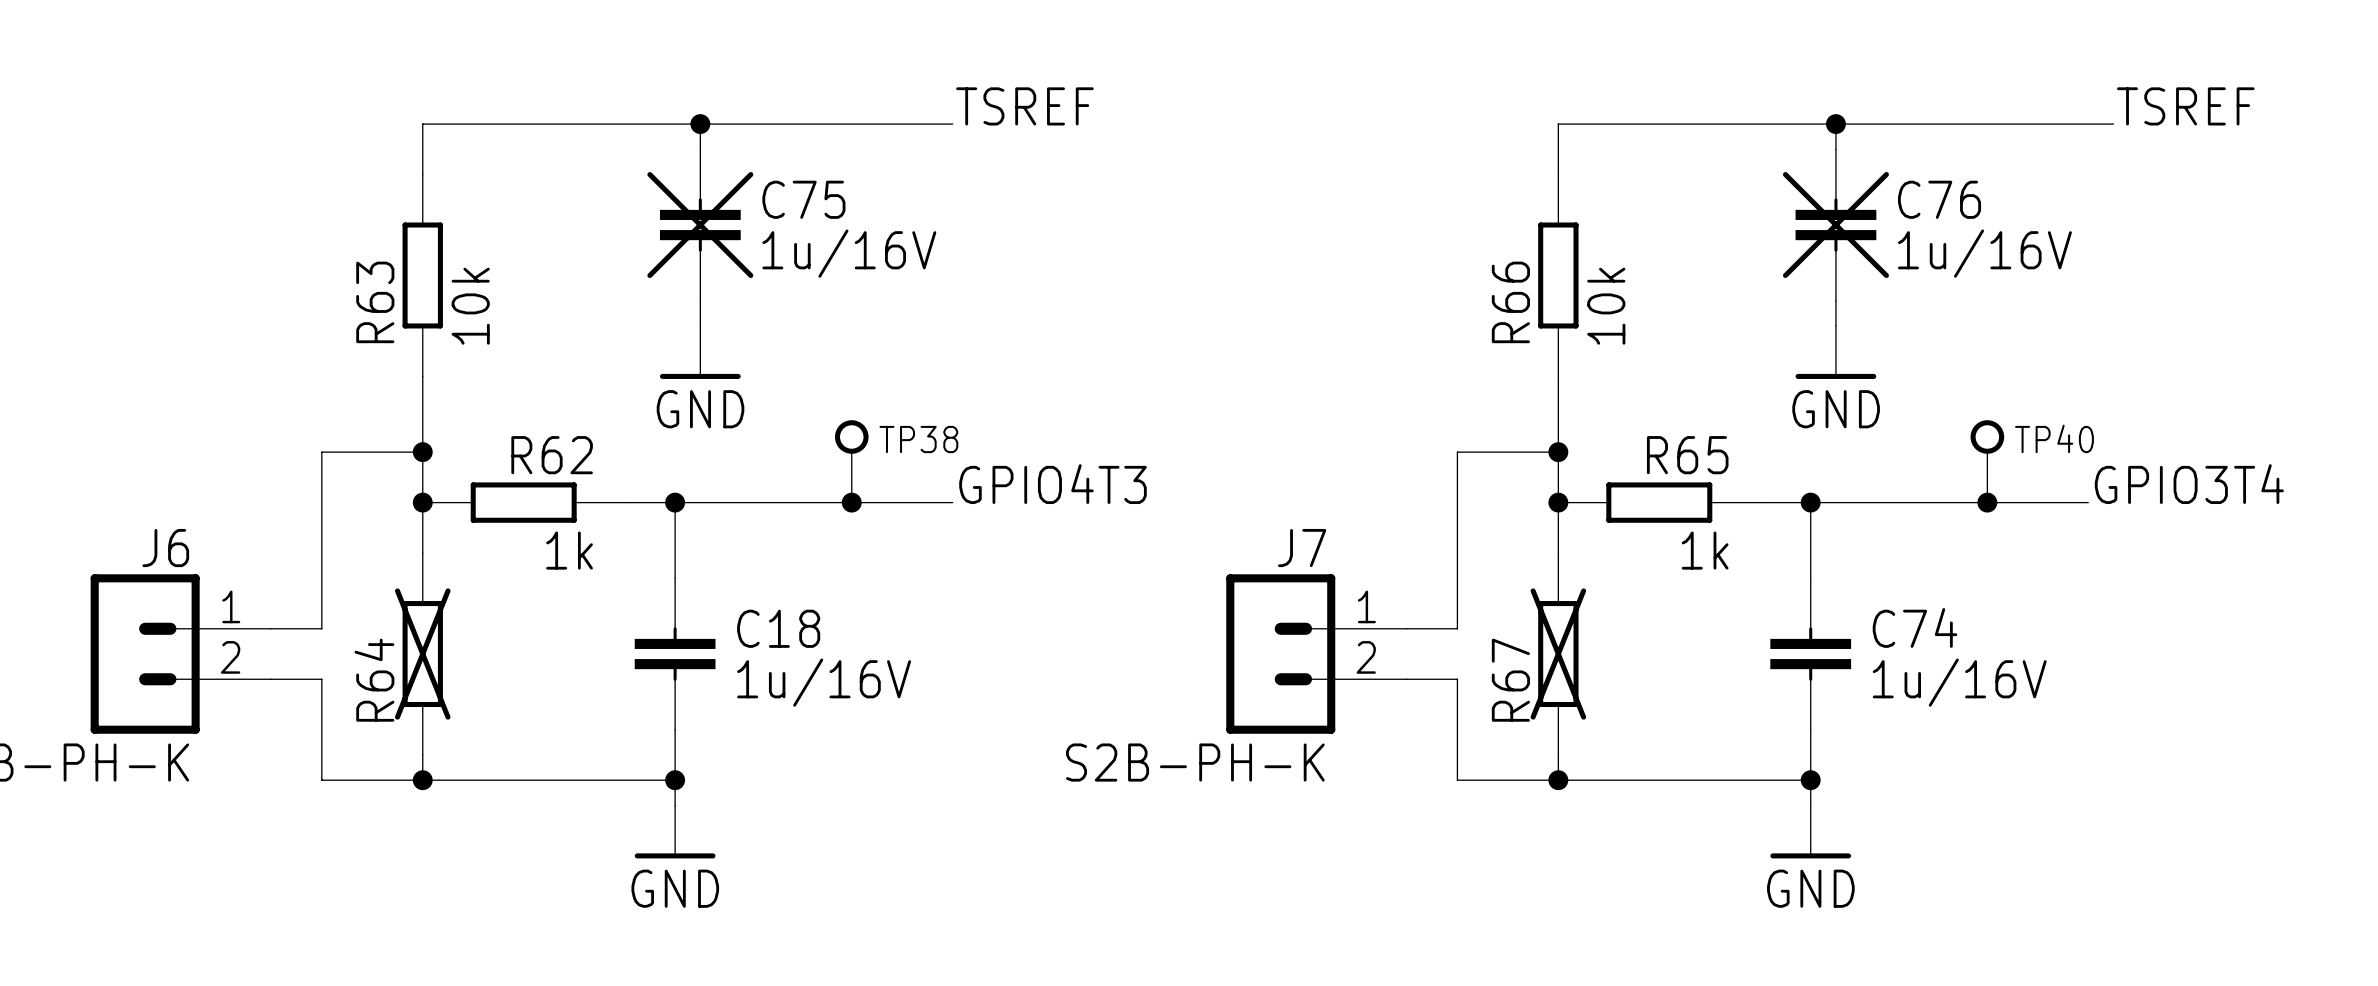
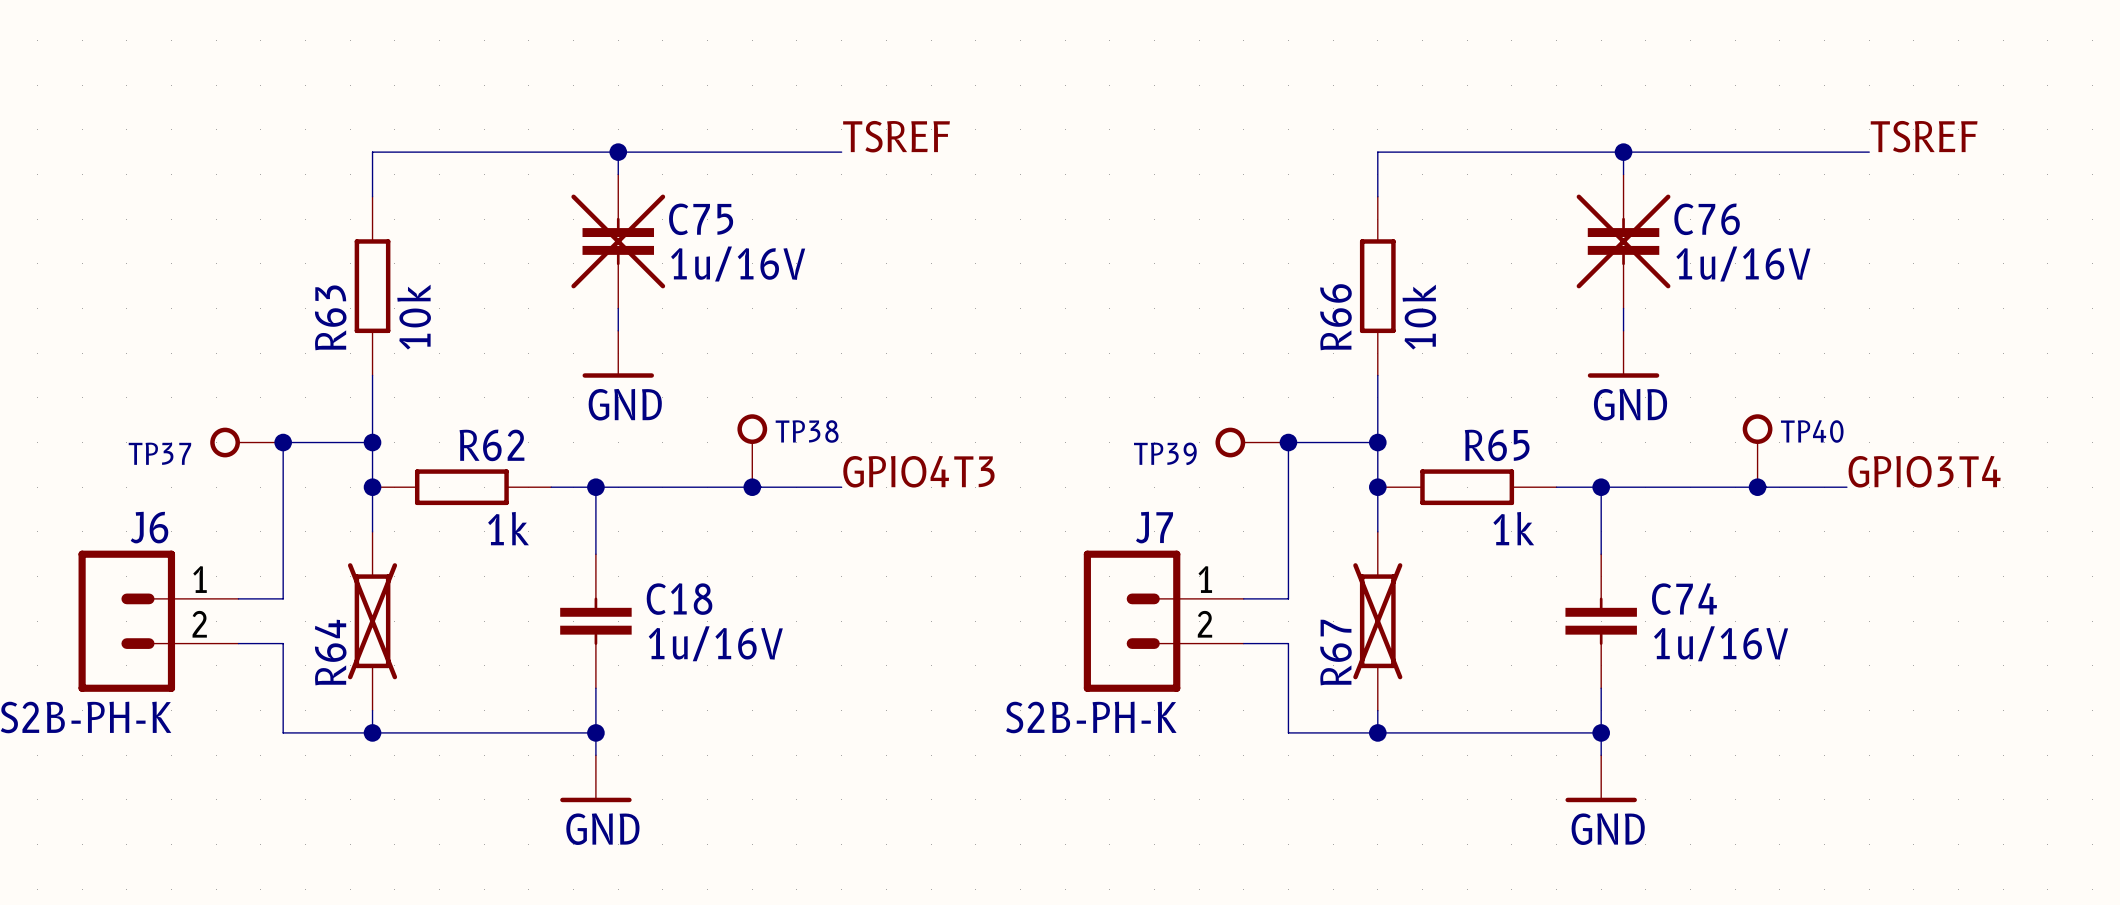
TP37: none -> (246, 442)
junction: none -> (283, 442)
TP39: none -> (1251, 442)
junction: none -> (1288, 442)

